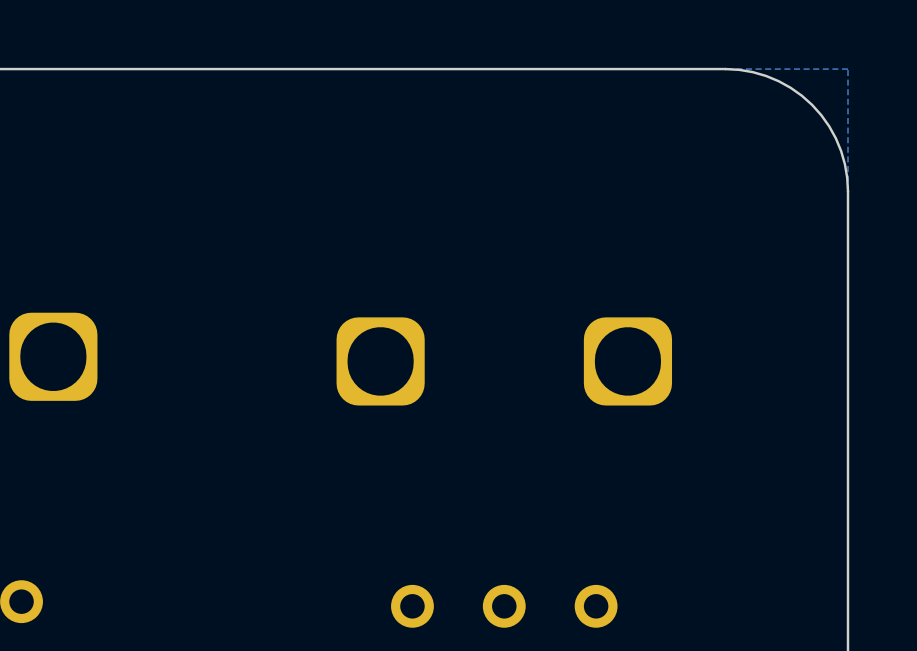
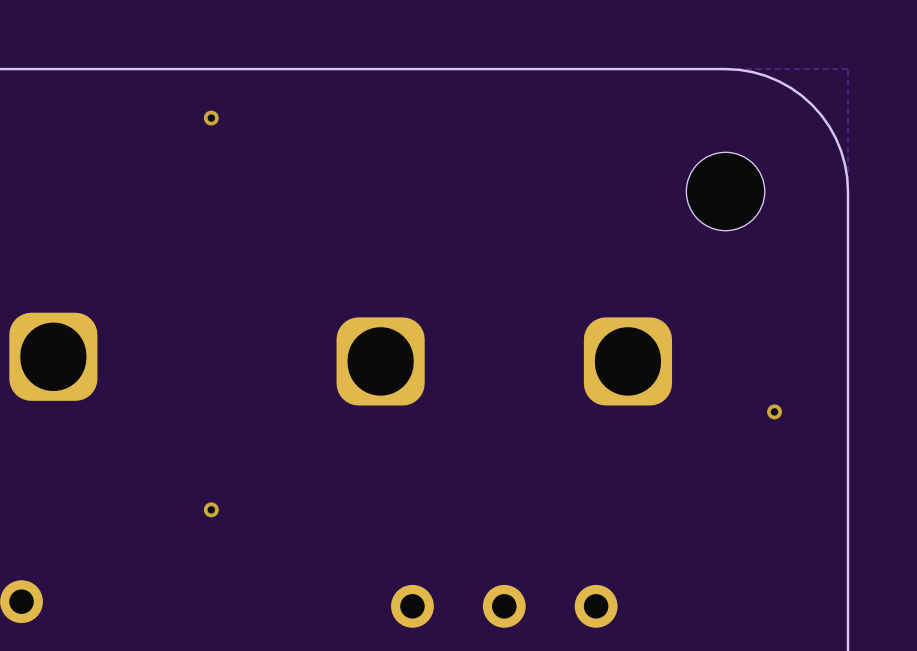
via: none -> (211, 118)
part: none -> (725, 191)
via: none -> (774, 411)
via: none -> (211, 509)

